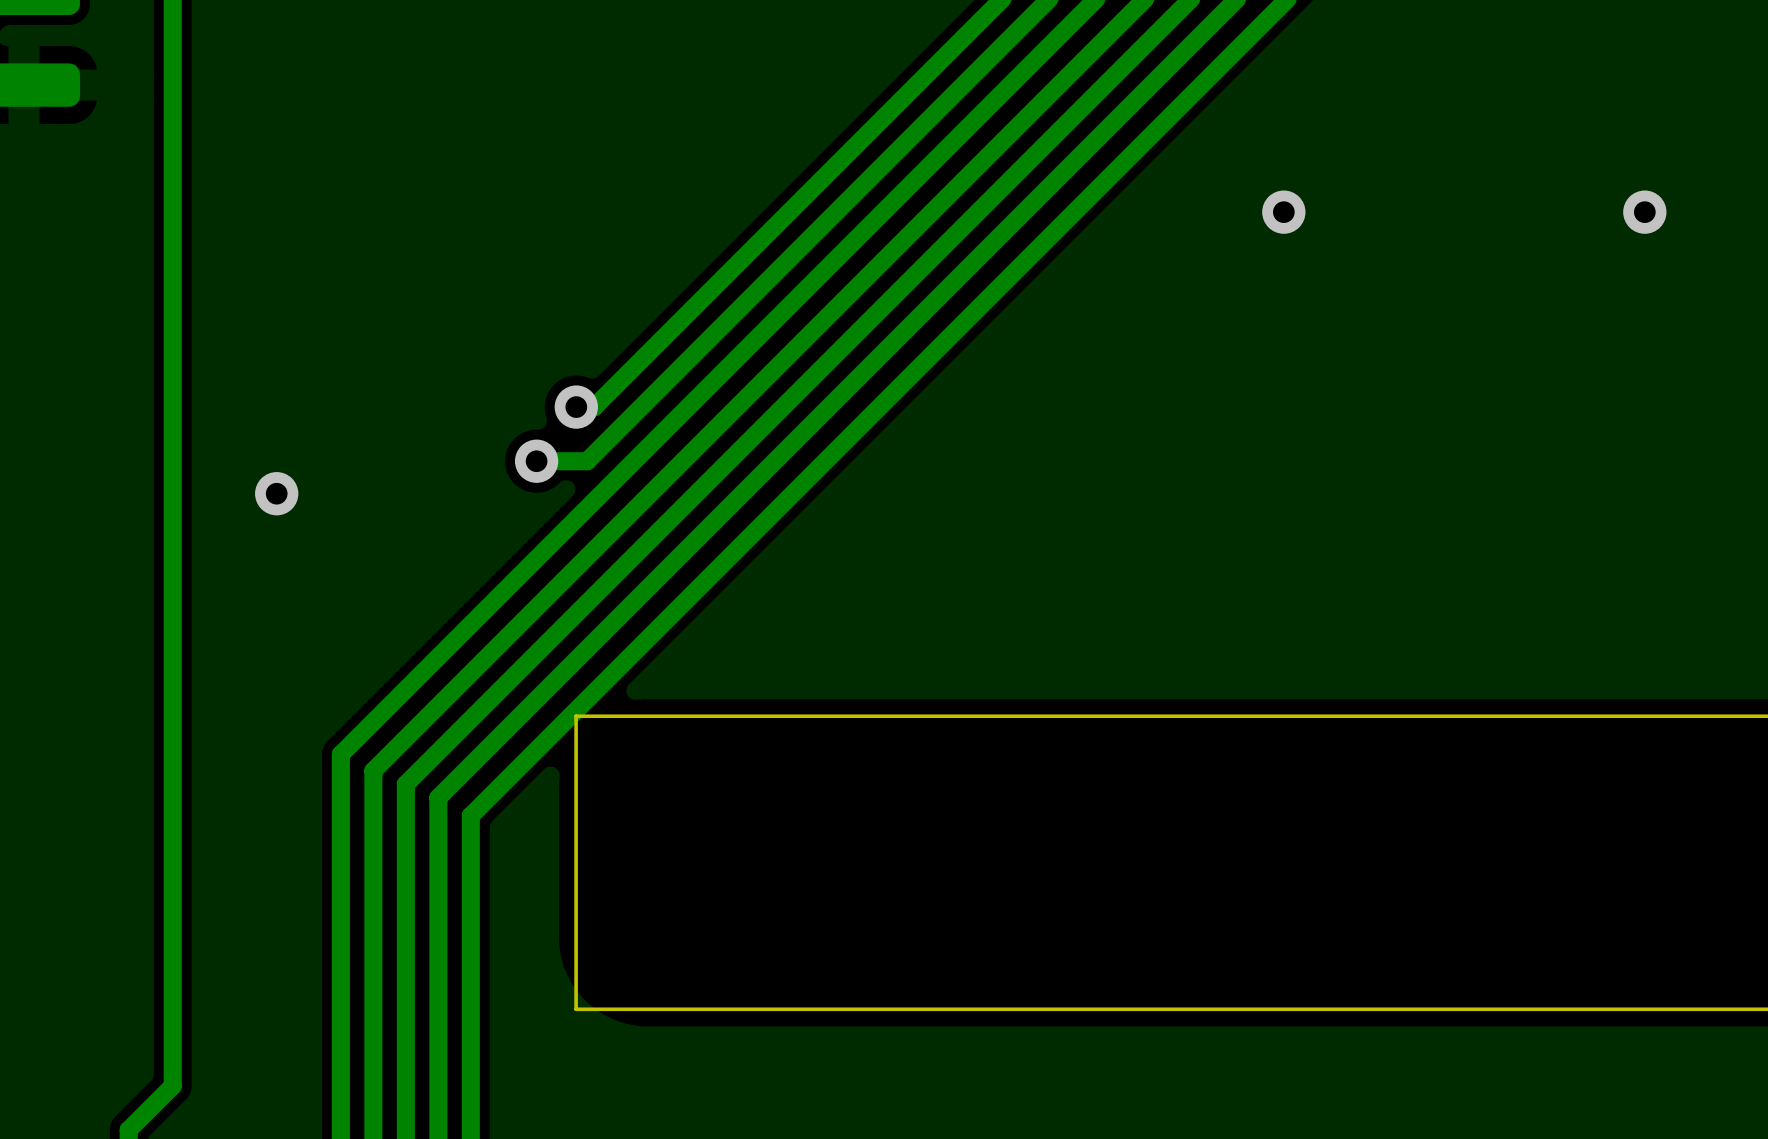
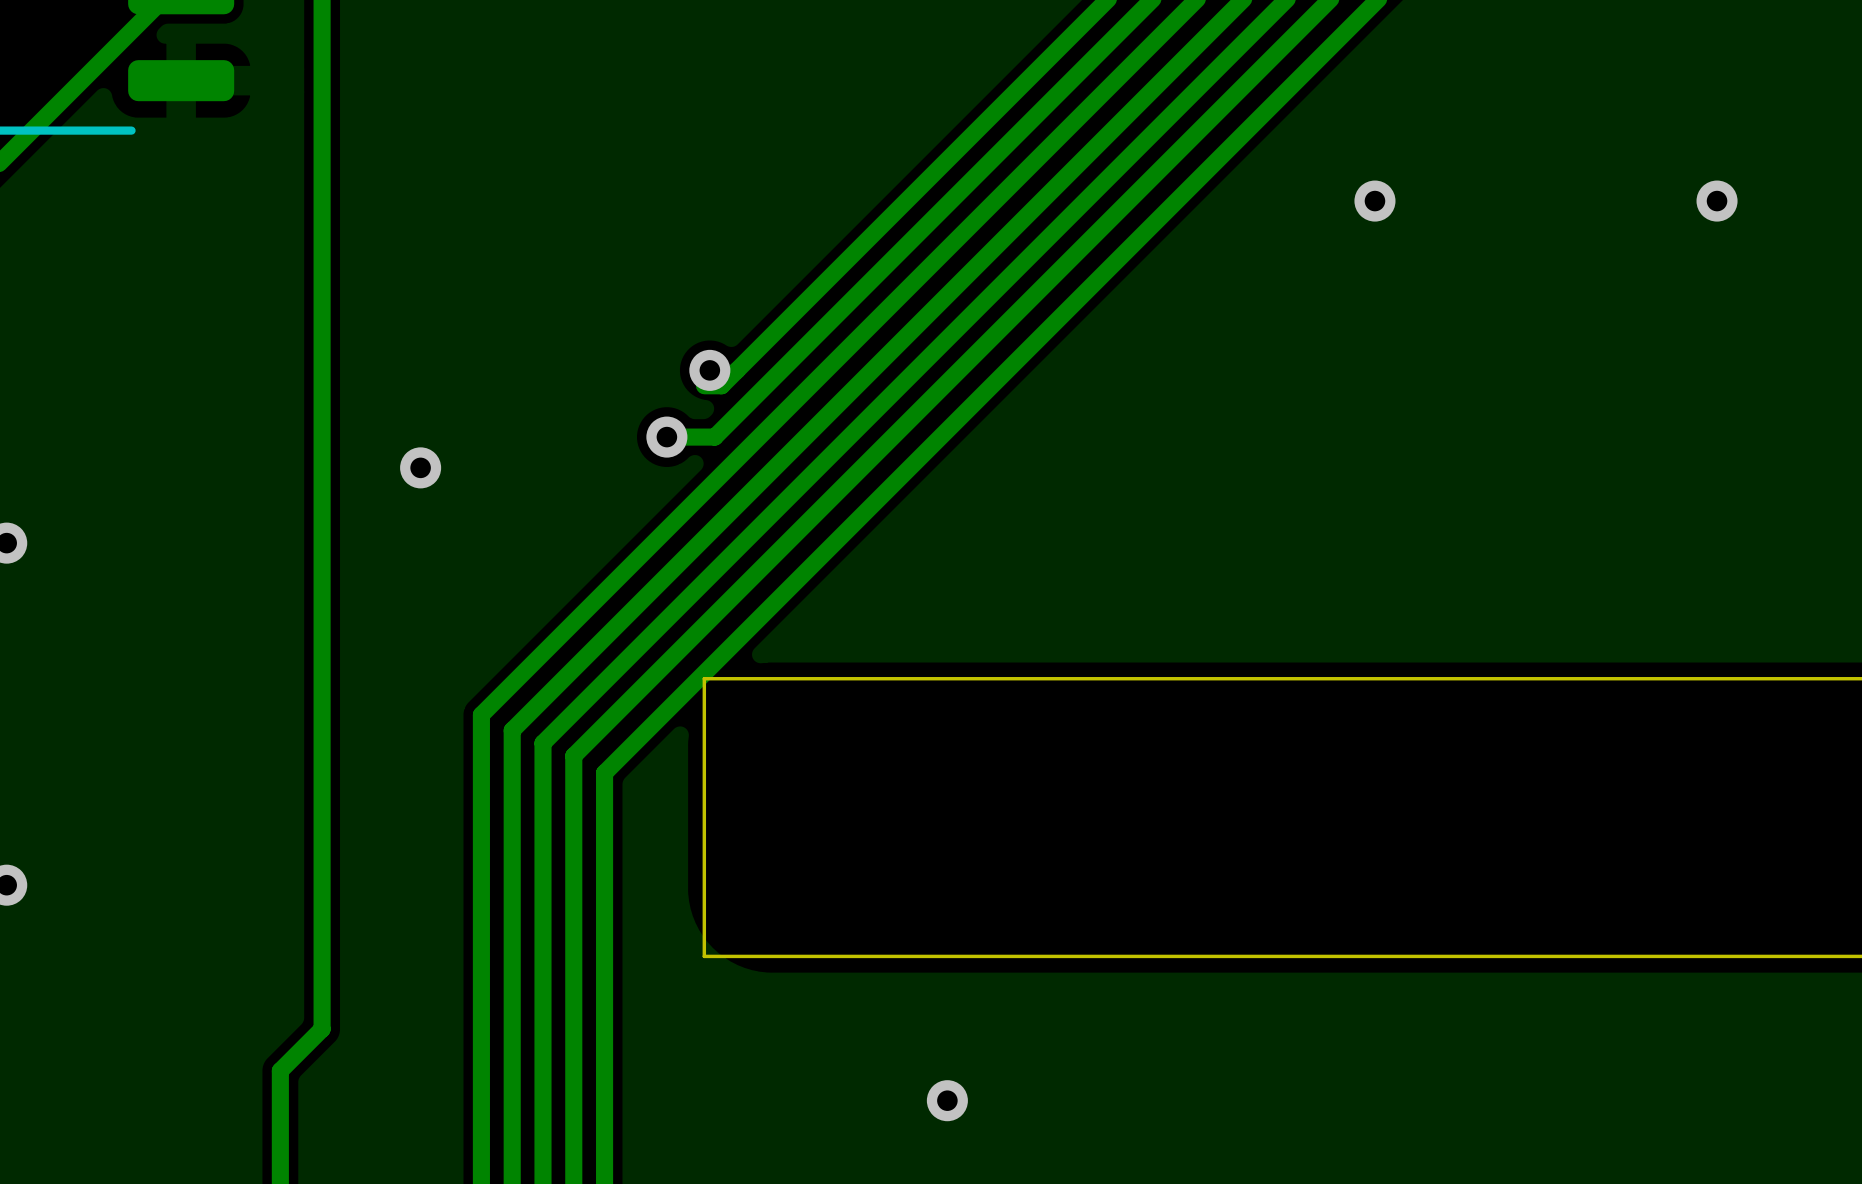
via position: (576, 407) -> (709, 370)

